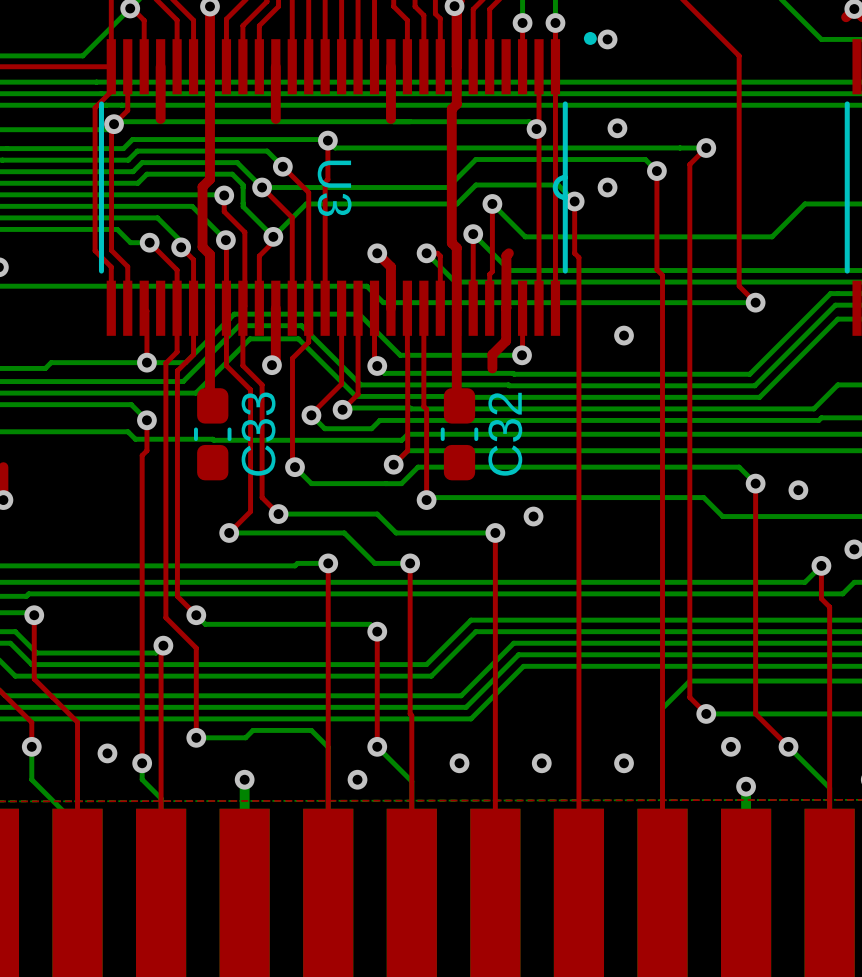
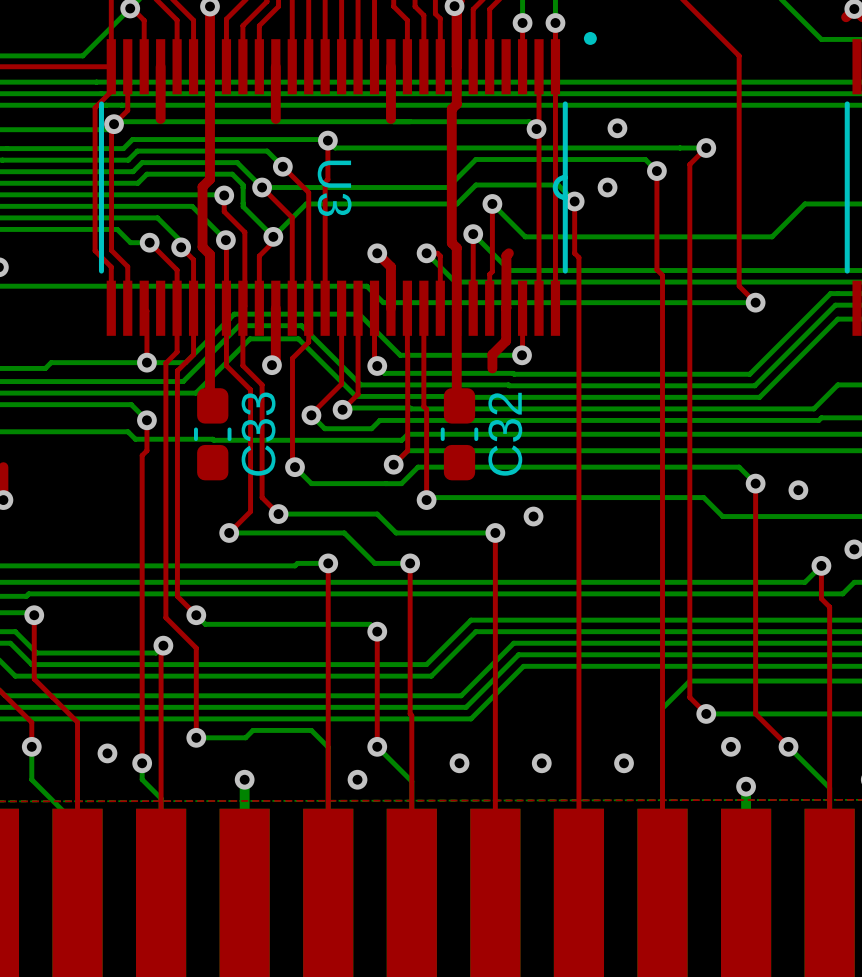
via: (607, 39) -> none
via: (624, 335) -> none

